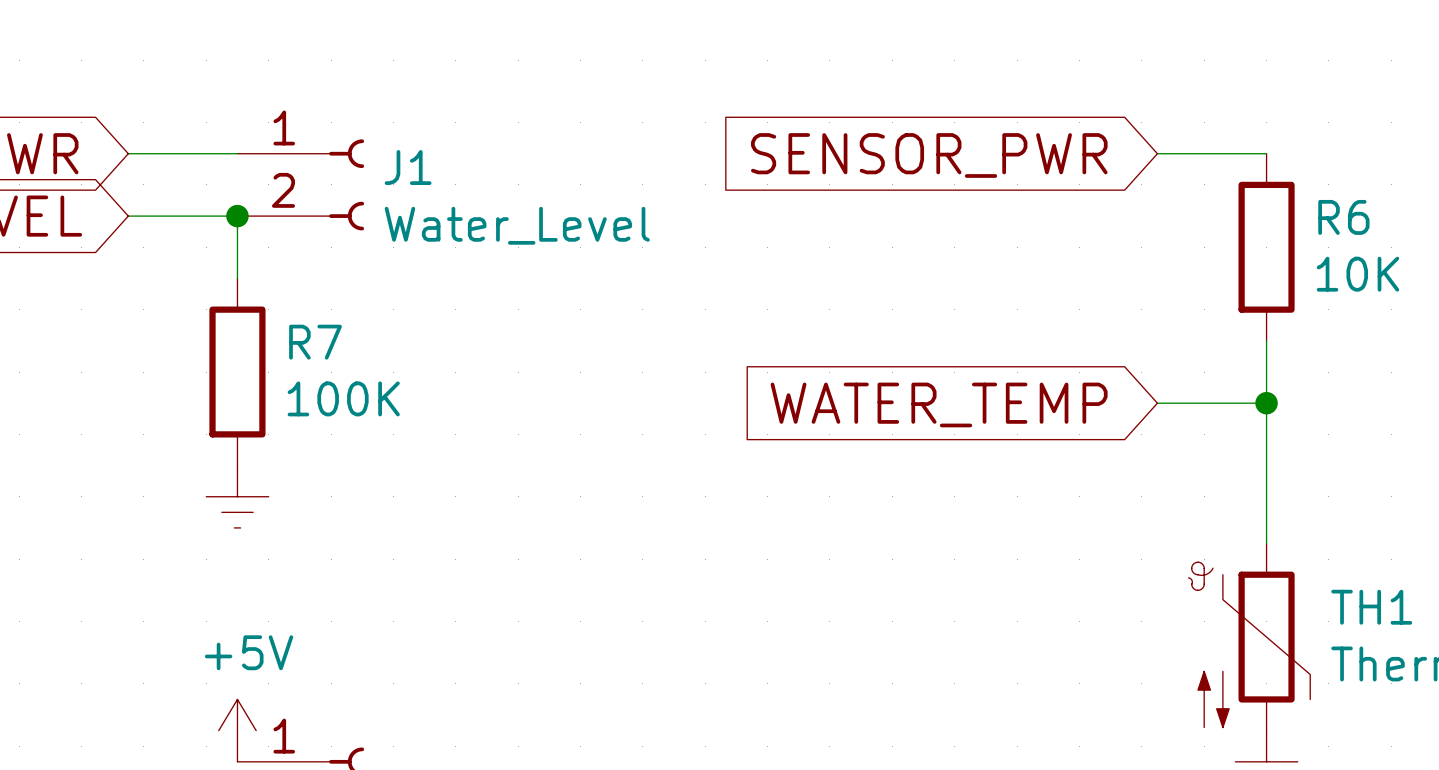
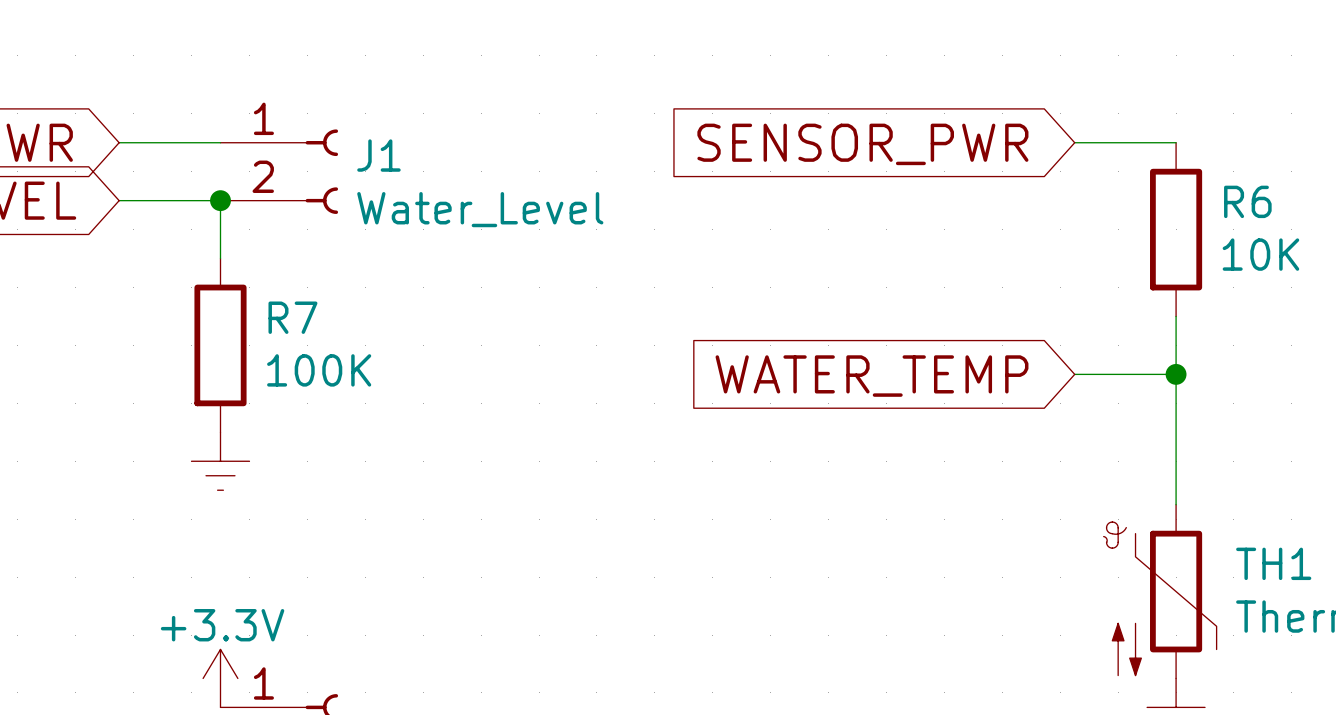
power symbol: +5V (237, 730) -> +3.3V (220, 678)

